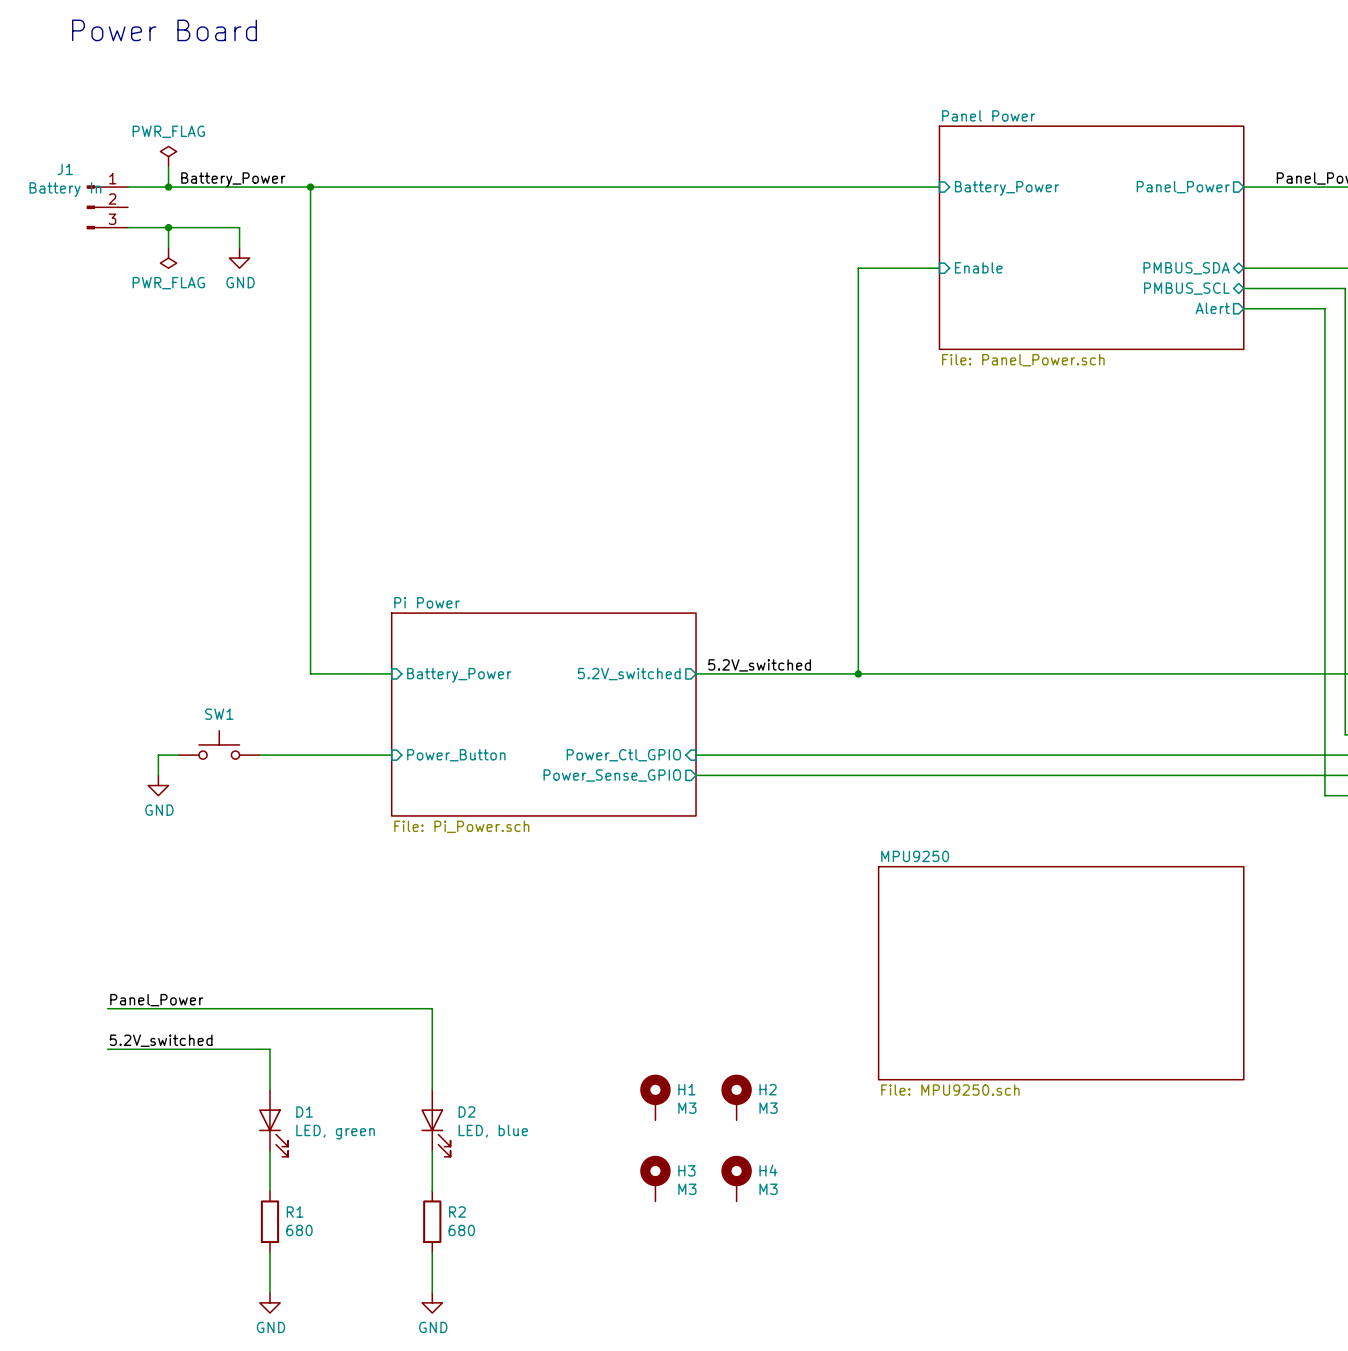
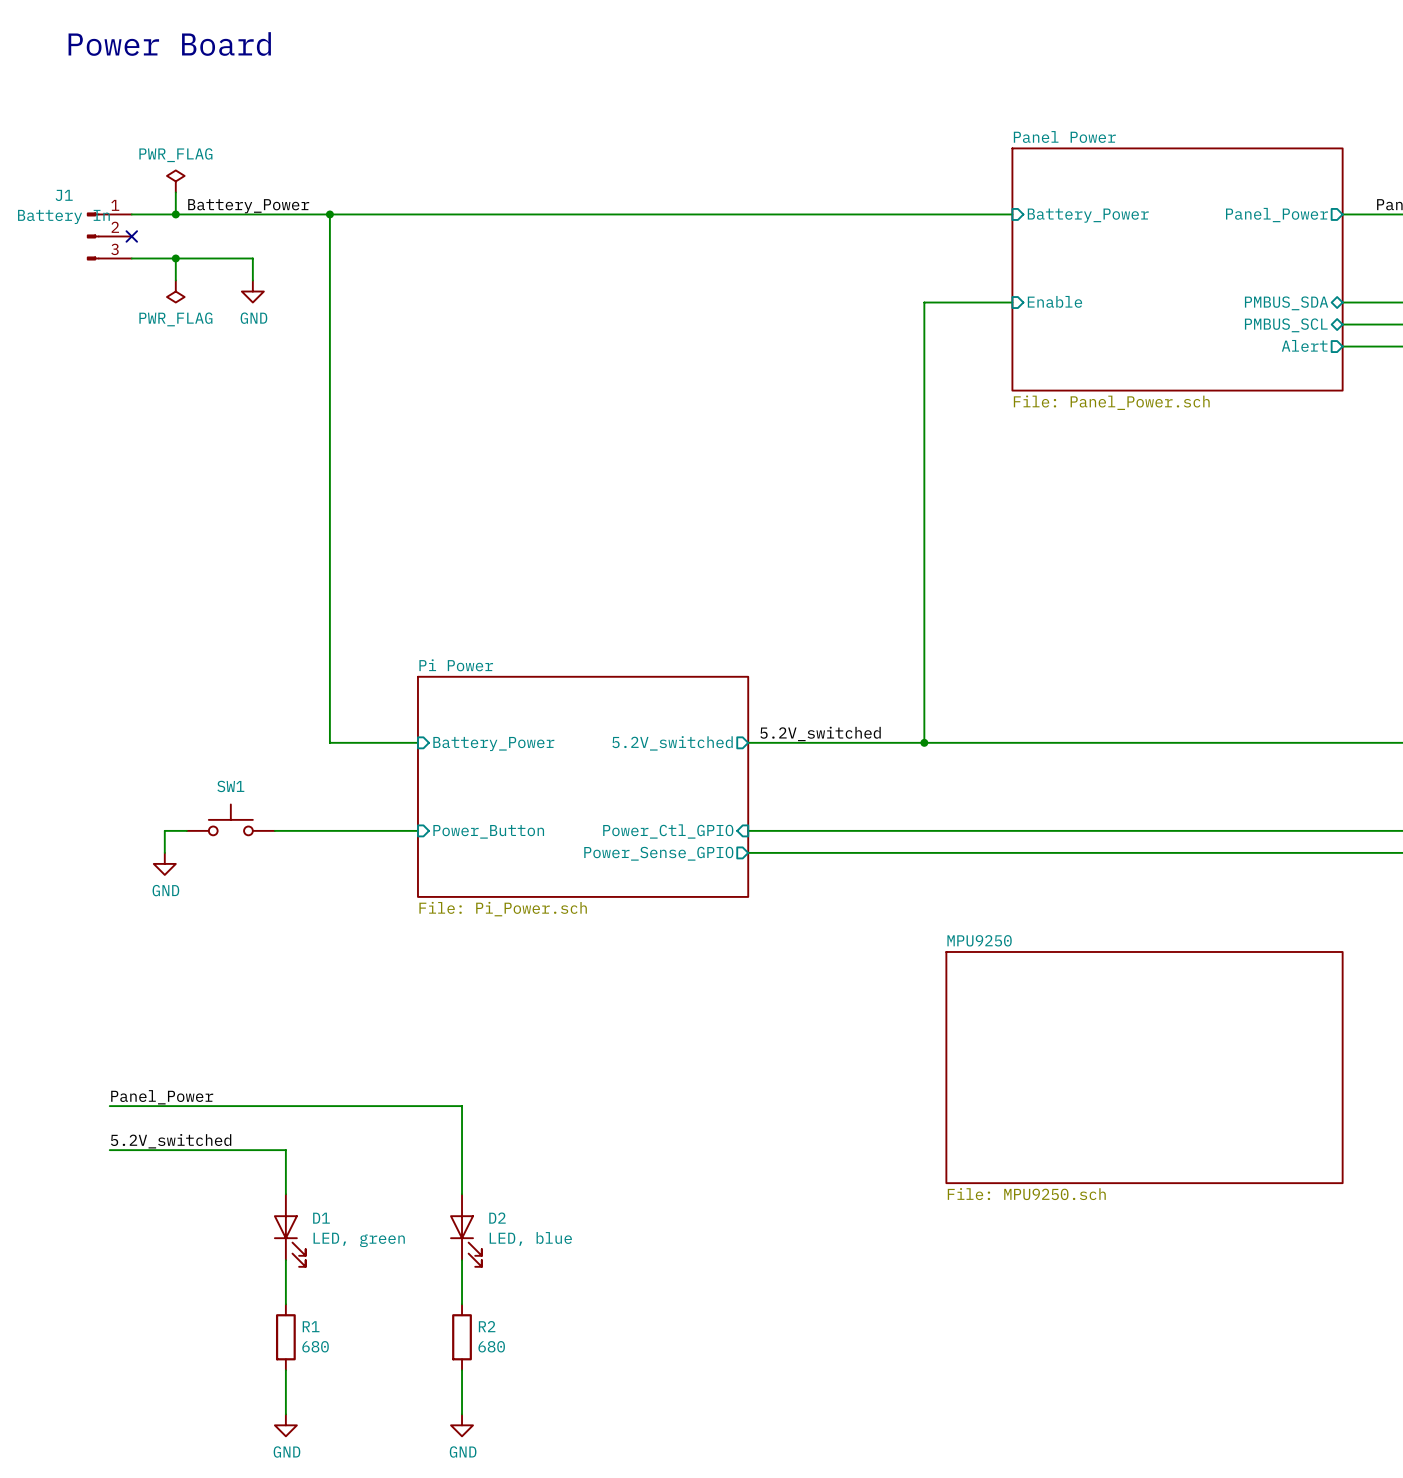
no-connect mark: none -> (131, 236)
H1: M3 (655, 1097) -> none
H2: M3 (736, 1097) -> none
H3: M3 (655, 1178) -> none
H4: M3 (736, 1178) -> none

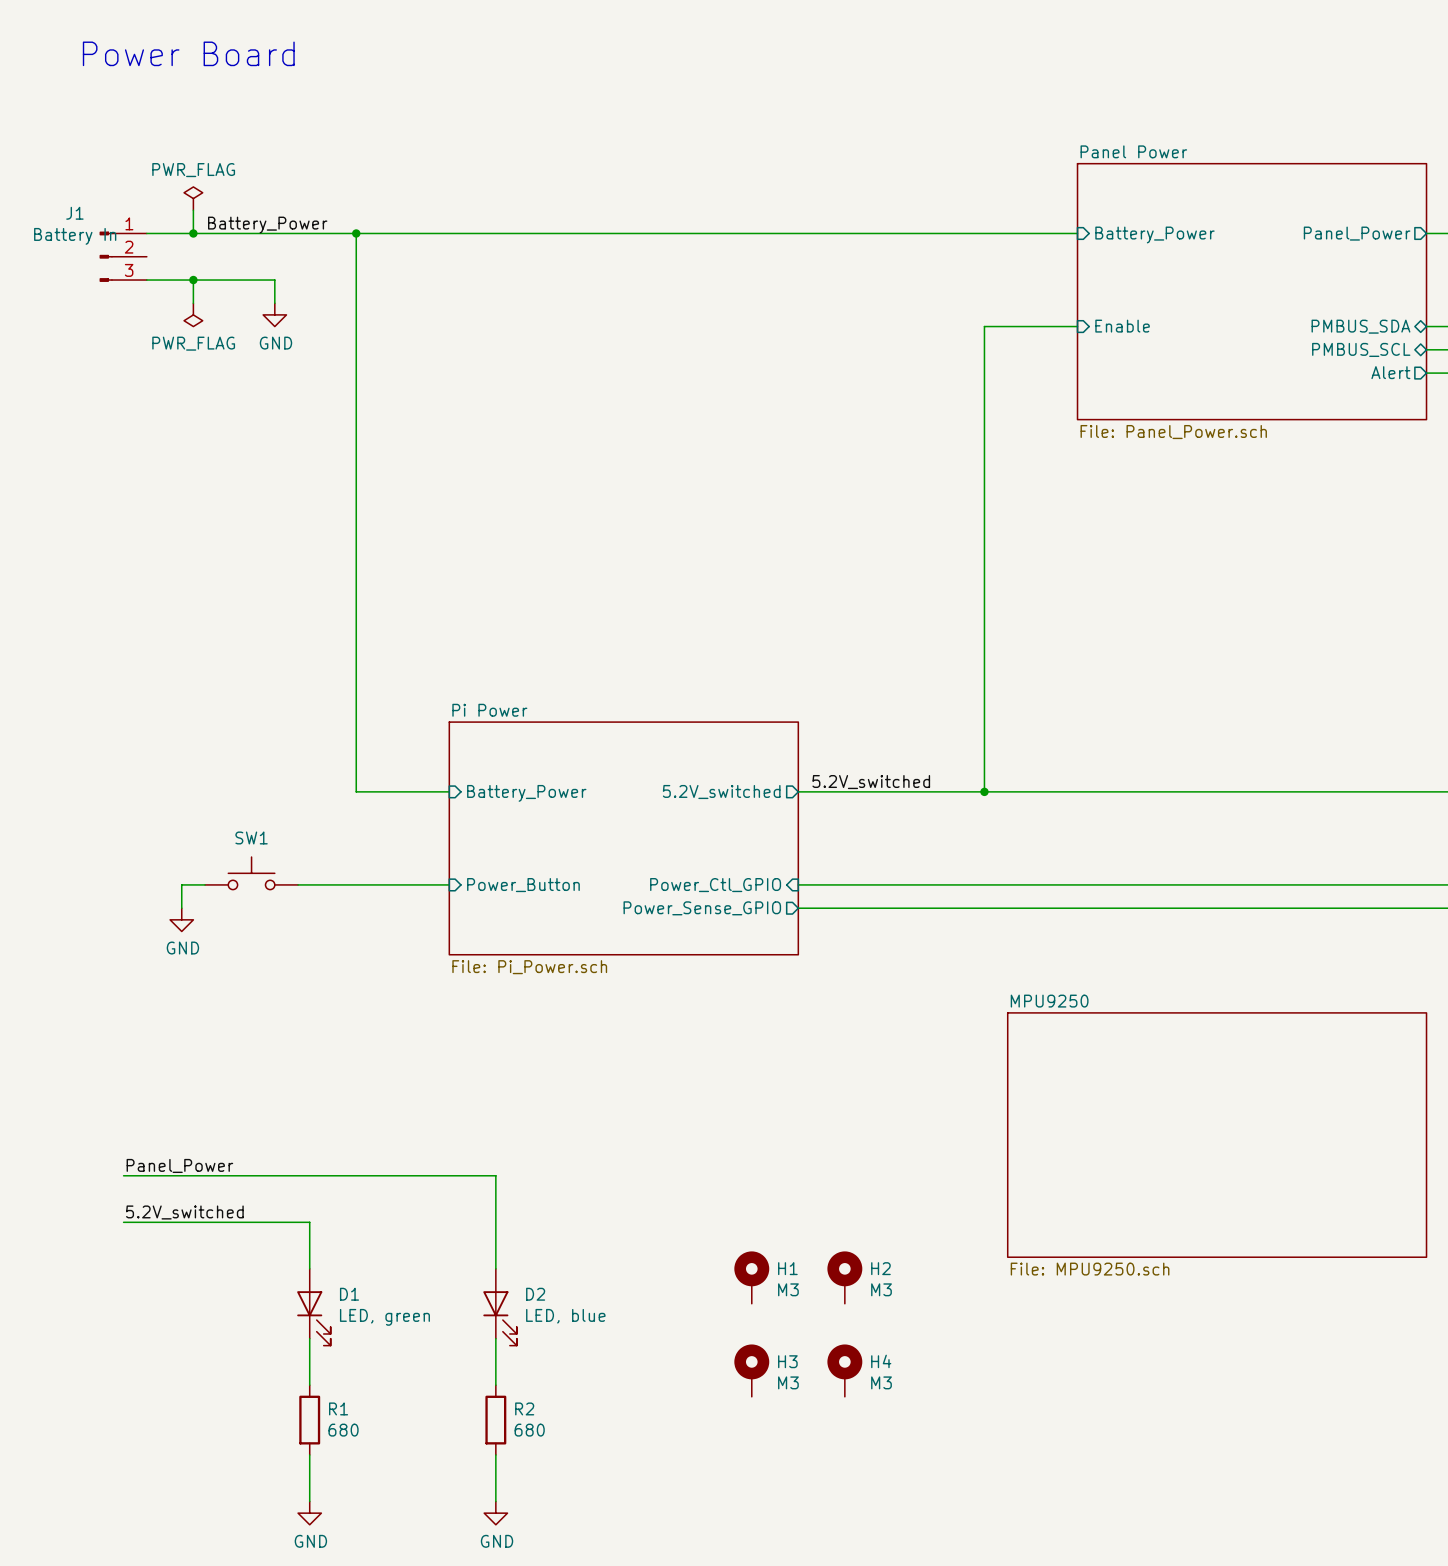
no-connect mark: (131, 236) -> none
H1: none -> M3 (751, 1277)
H2: none -> M3 (844, 1277)
H3: none -> M3 (751, 1370)
H4: none -> M3 (844, 1370)

